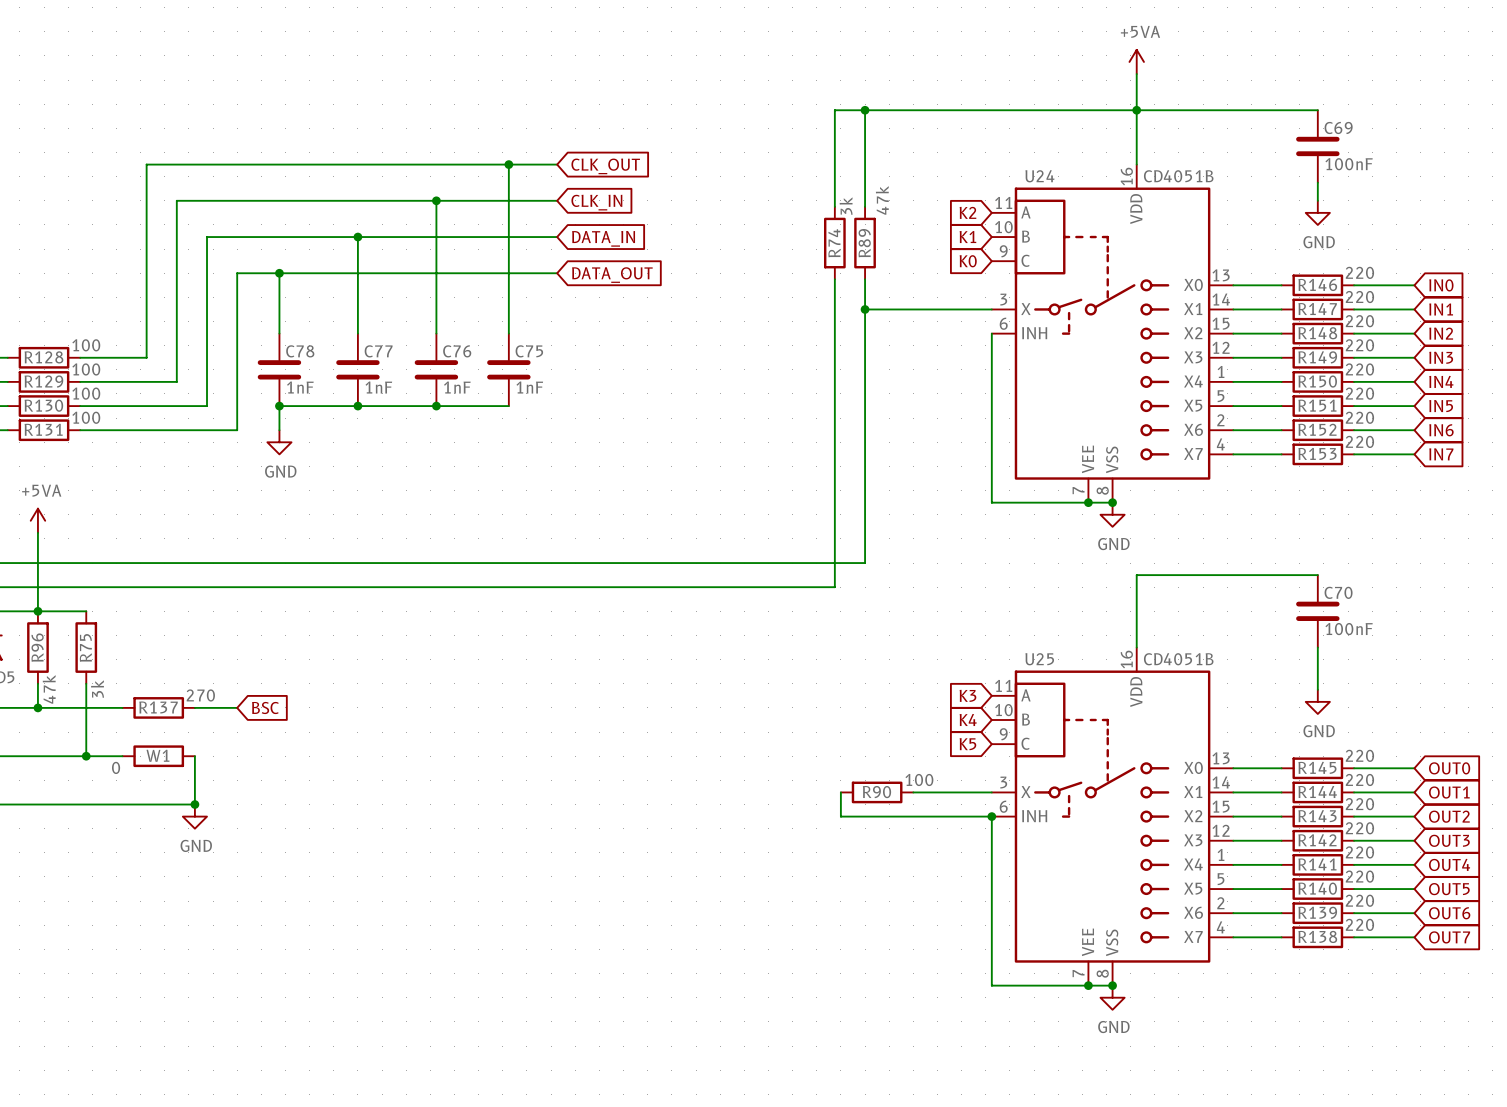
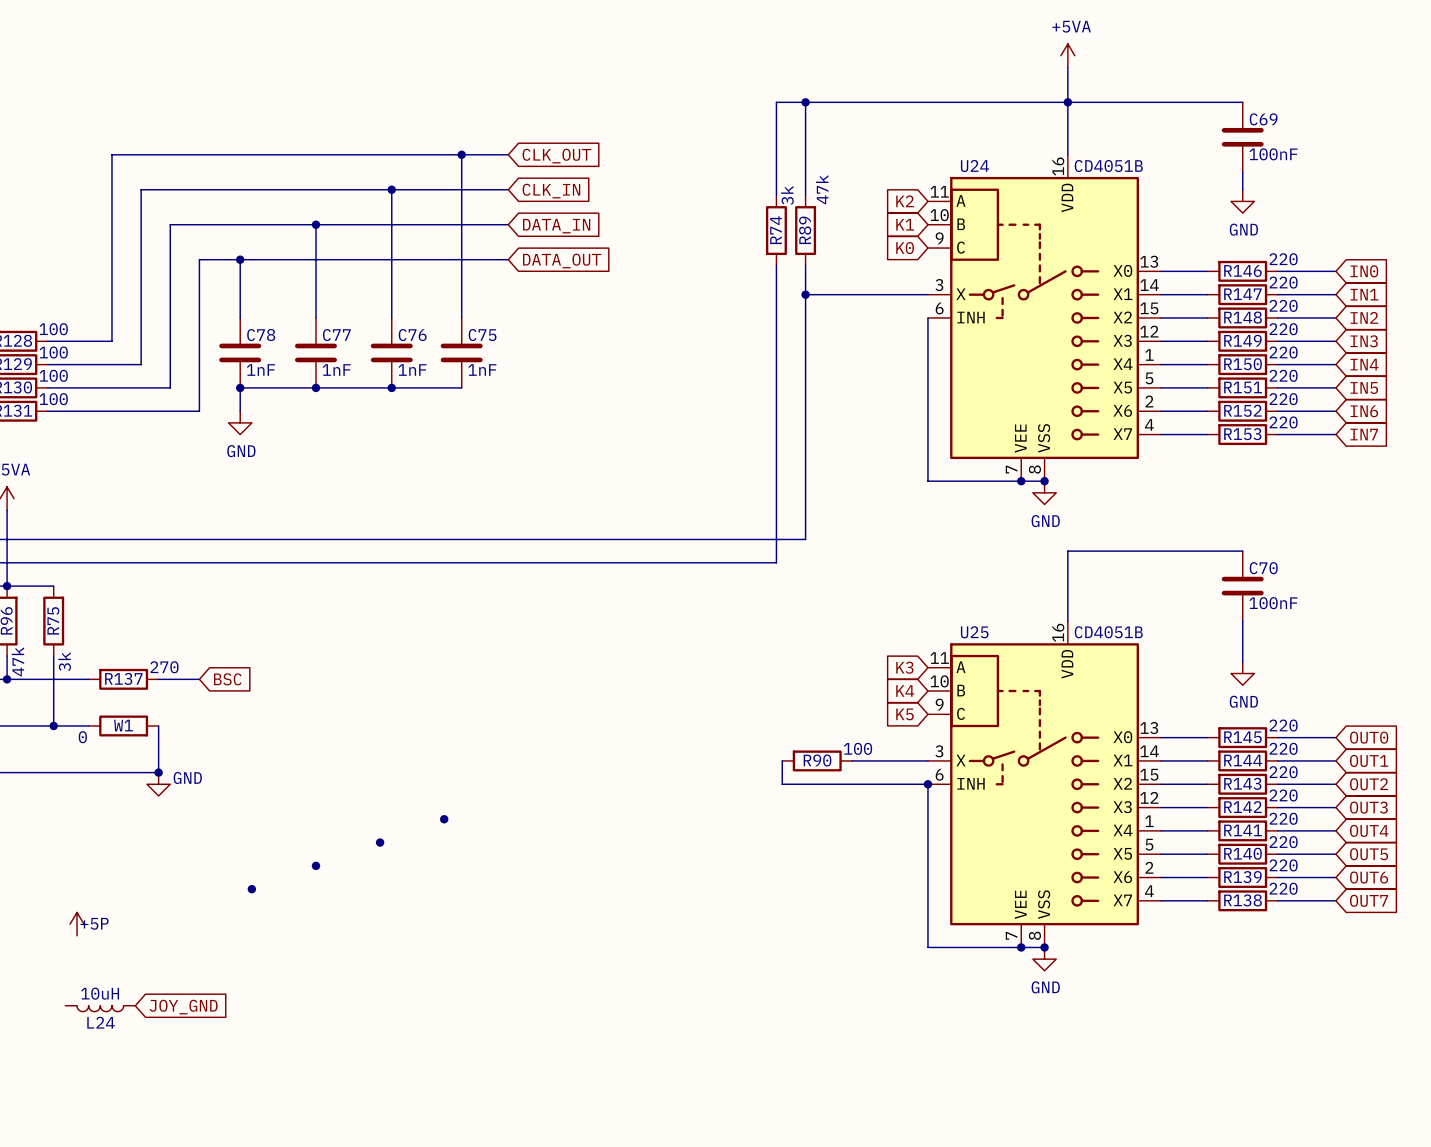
power symbol text position: GND (196, 845) -> GND (187, 778)
junction: none -> (444, 819)
junction: none -> (380, 842)
junction: none -> (315, 865)
junction: none -> (251, 889)
power symbol: none -> +5P (77, 924)
global label: none -> JOY_GND (183, 1007)
L24: none -> 10uH (100, 1008)

